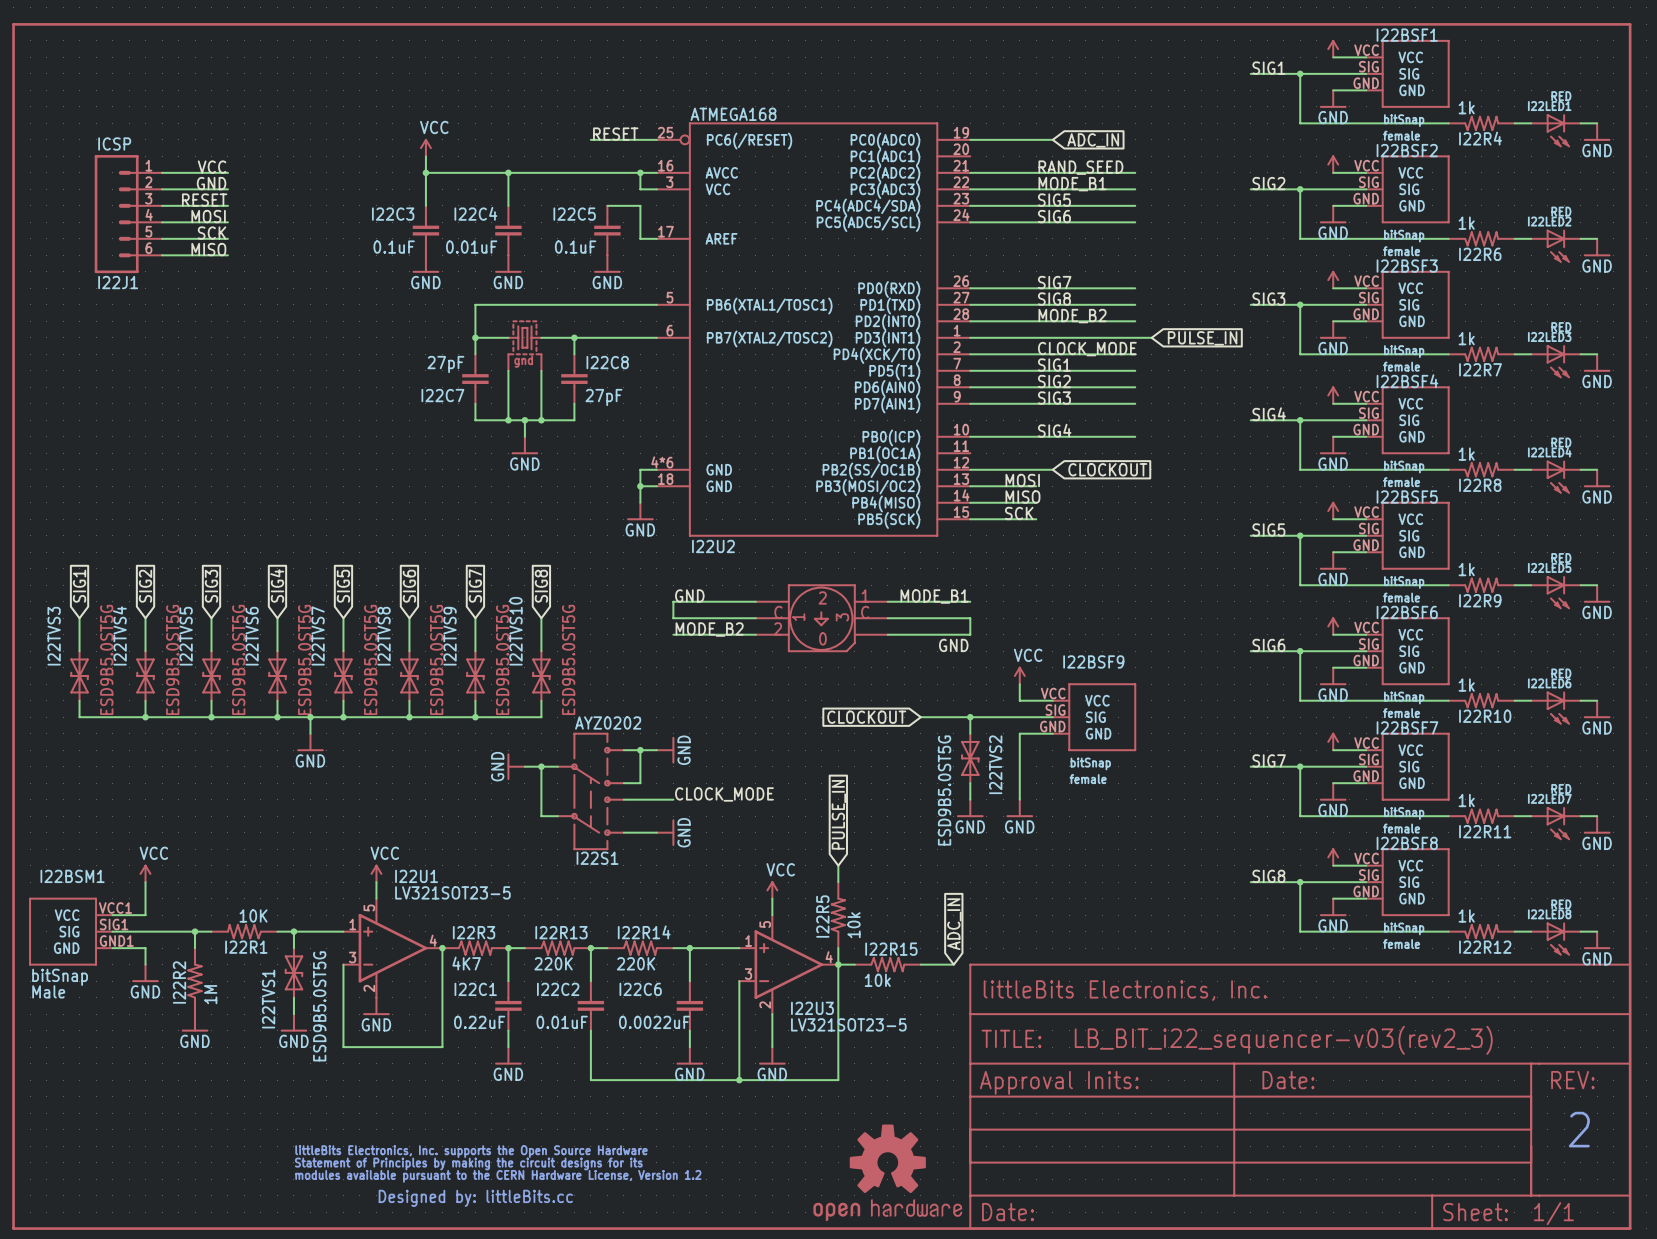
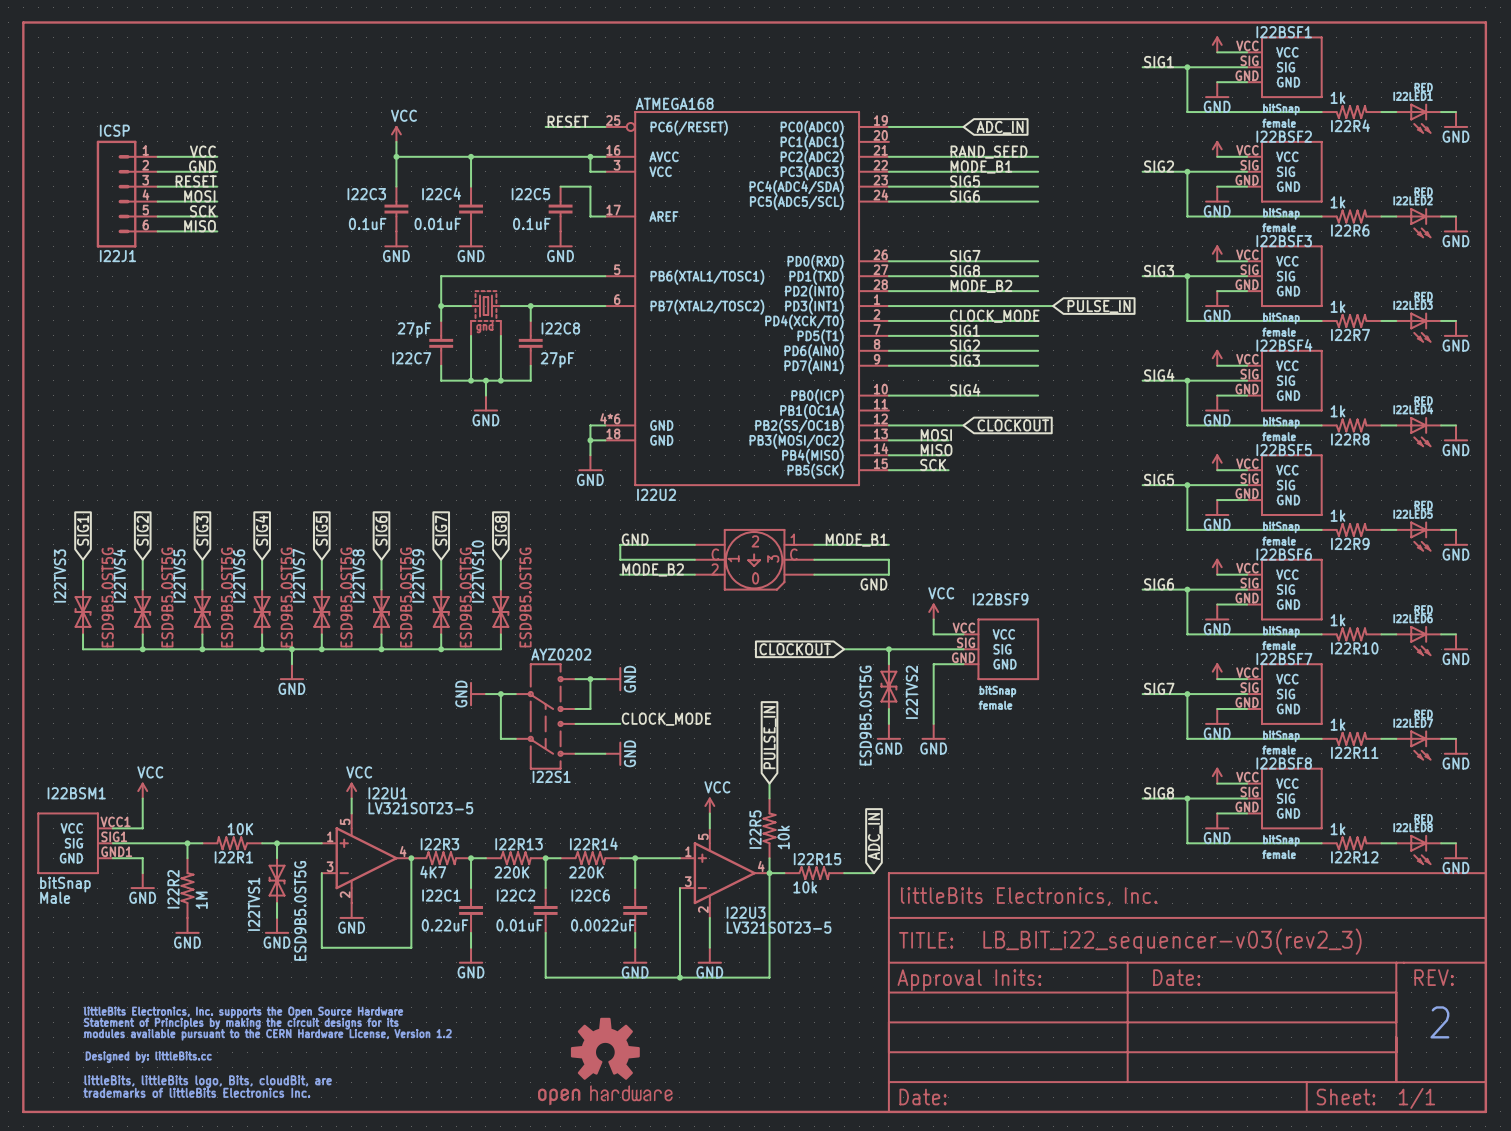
part: none -> (267, 1052)
part: none -> (605, 1061)
part: (887, 1172) -> none
part: (498, 1176) -> none

